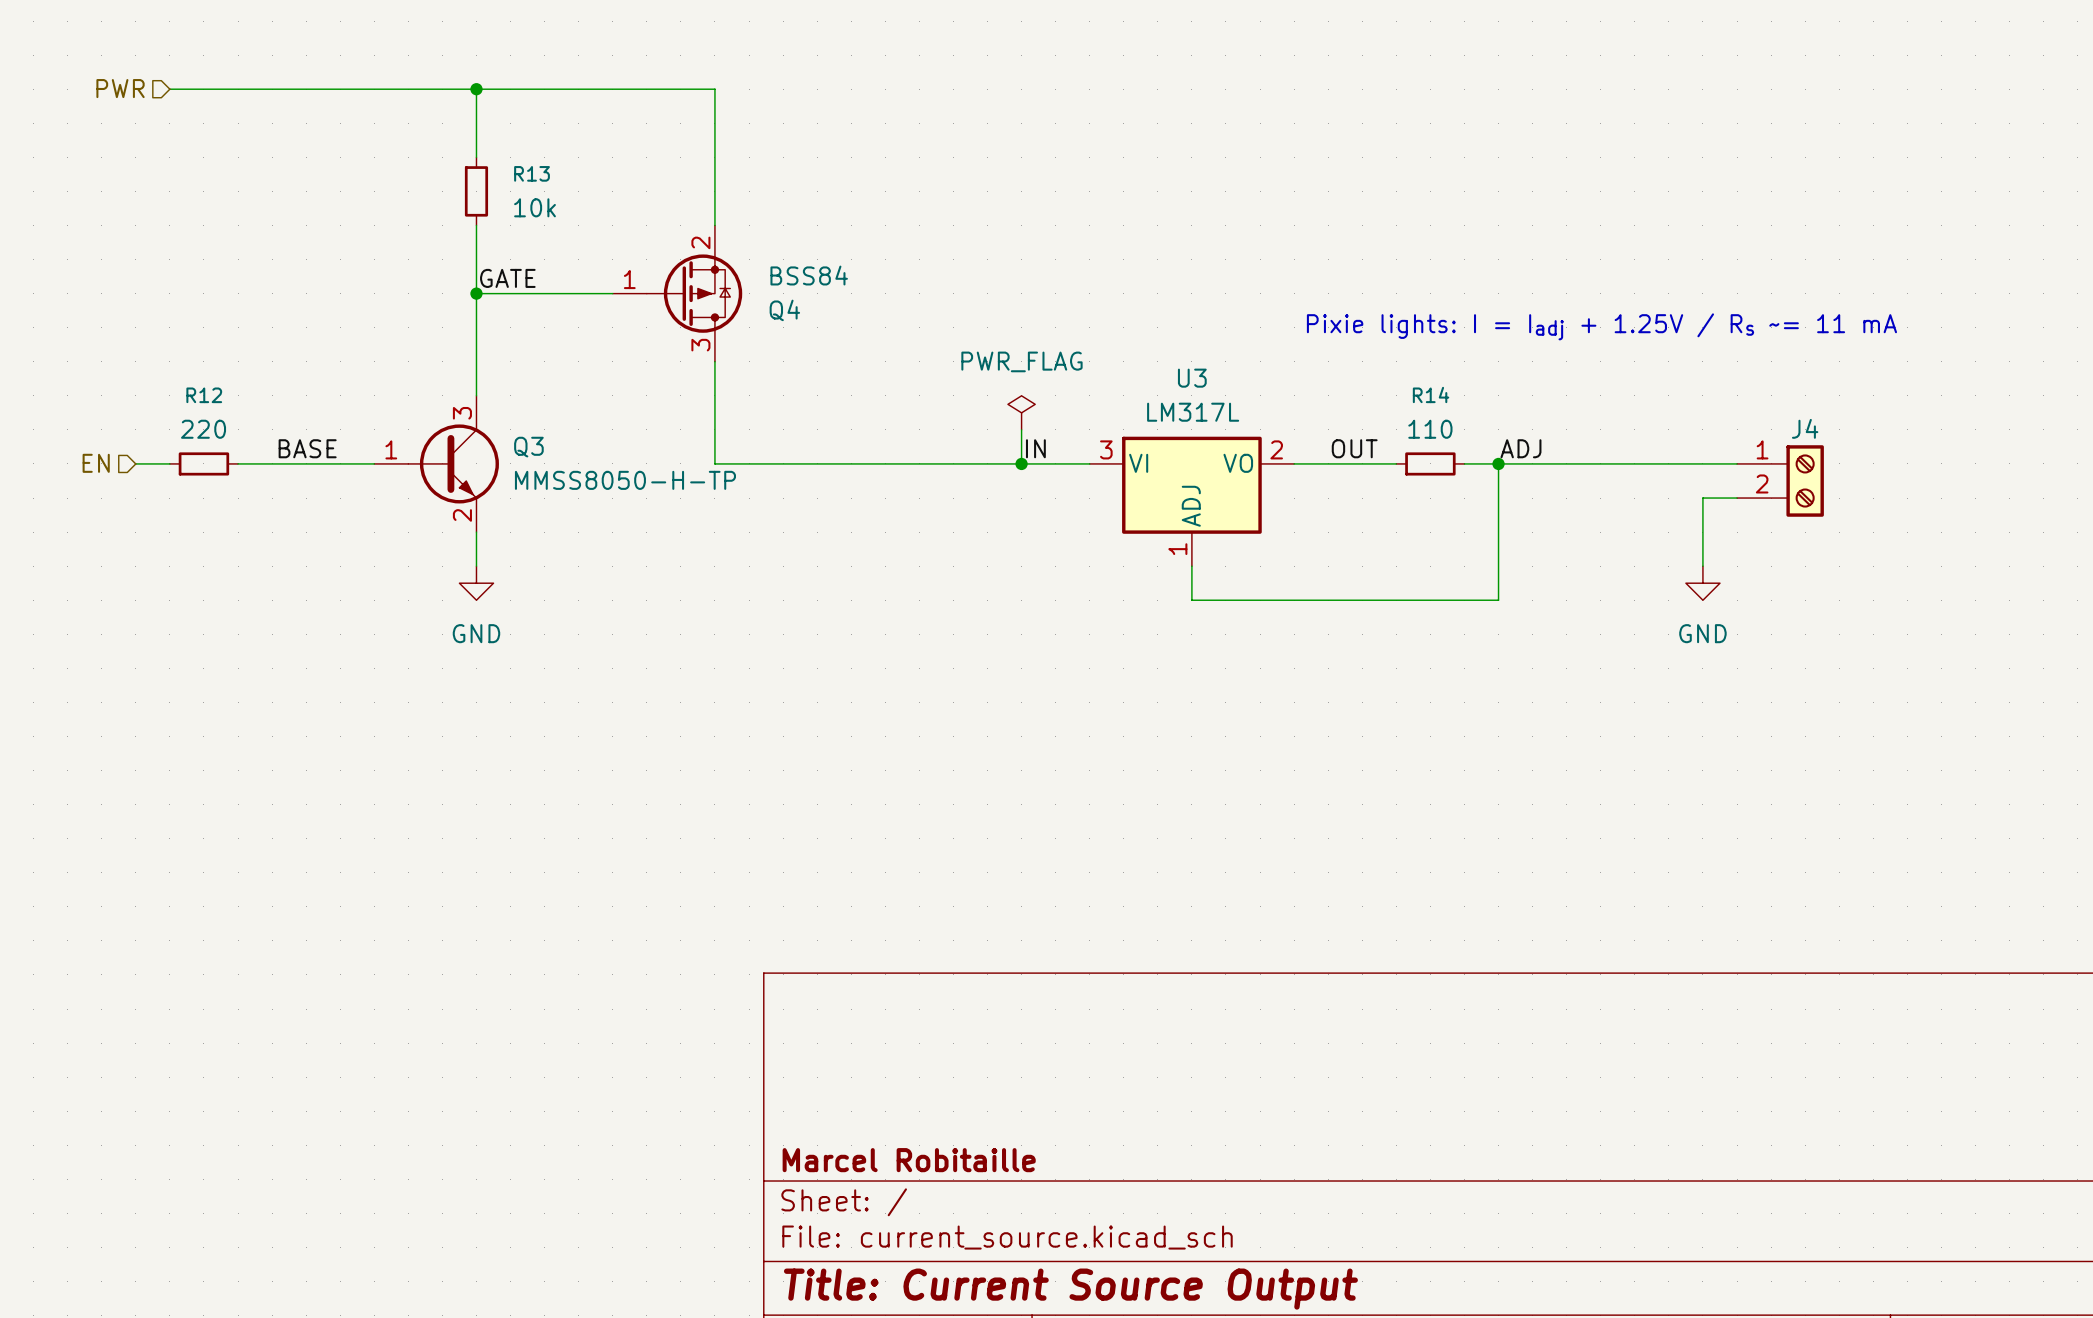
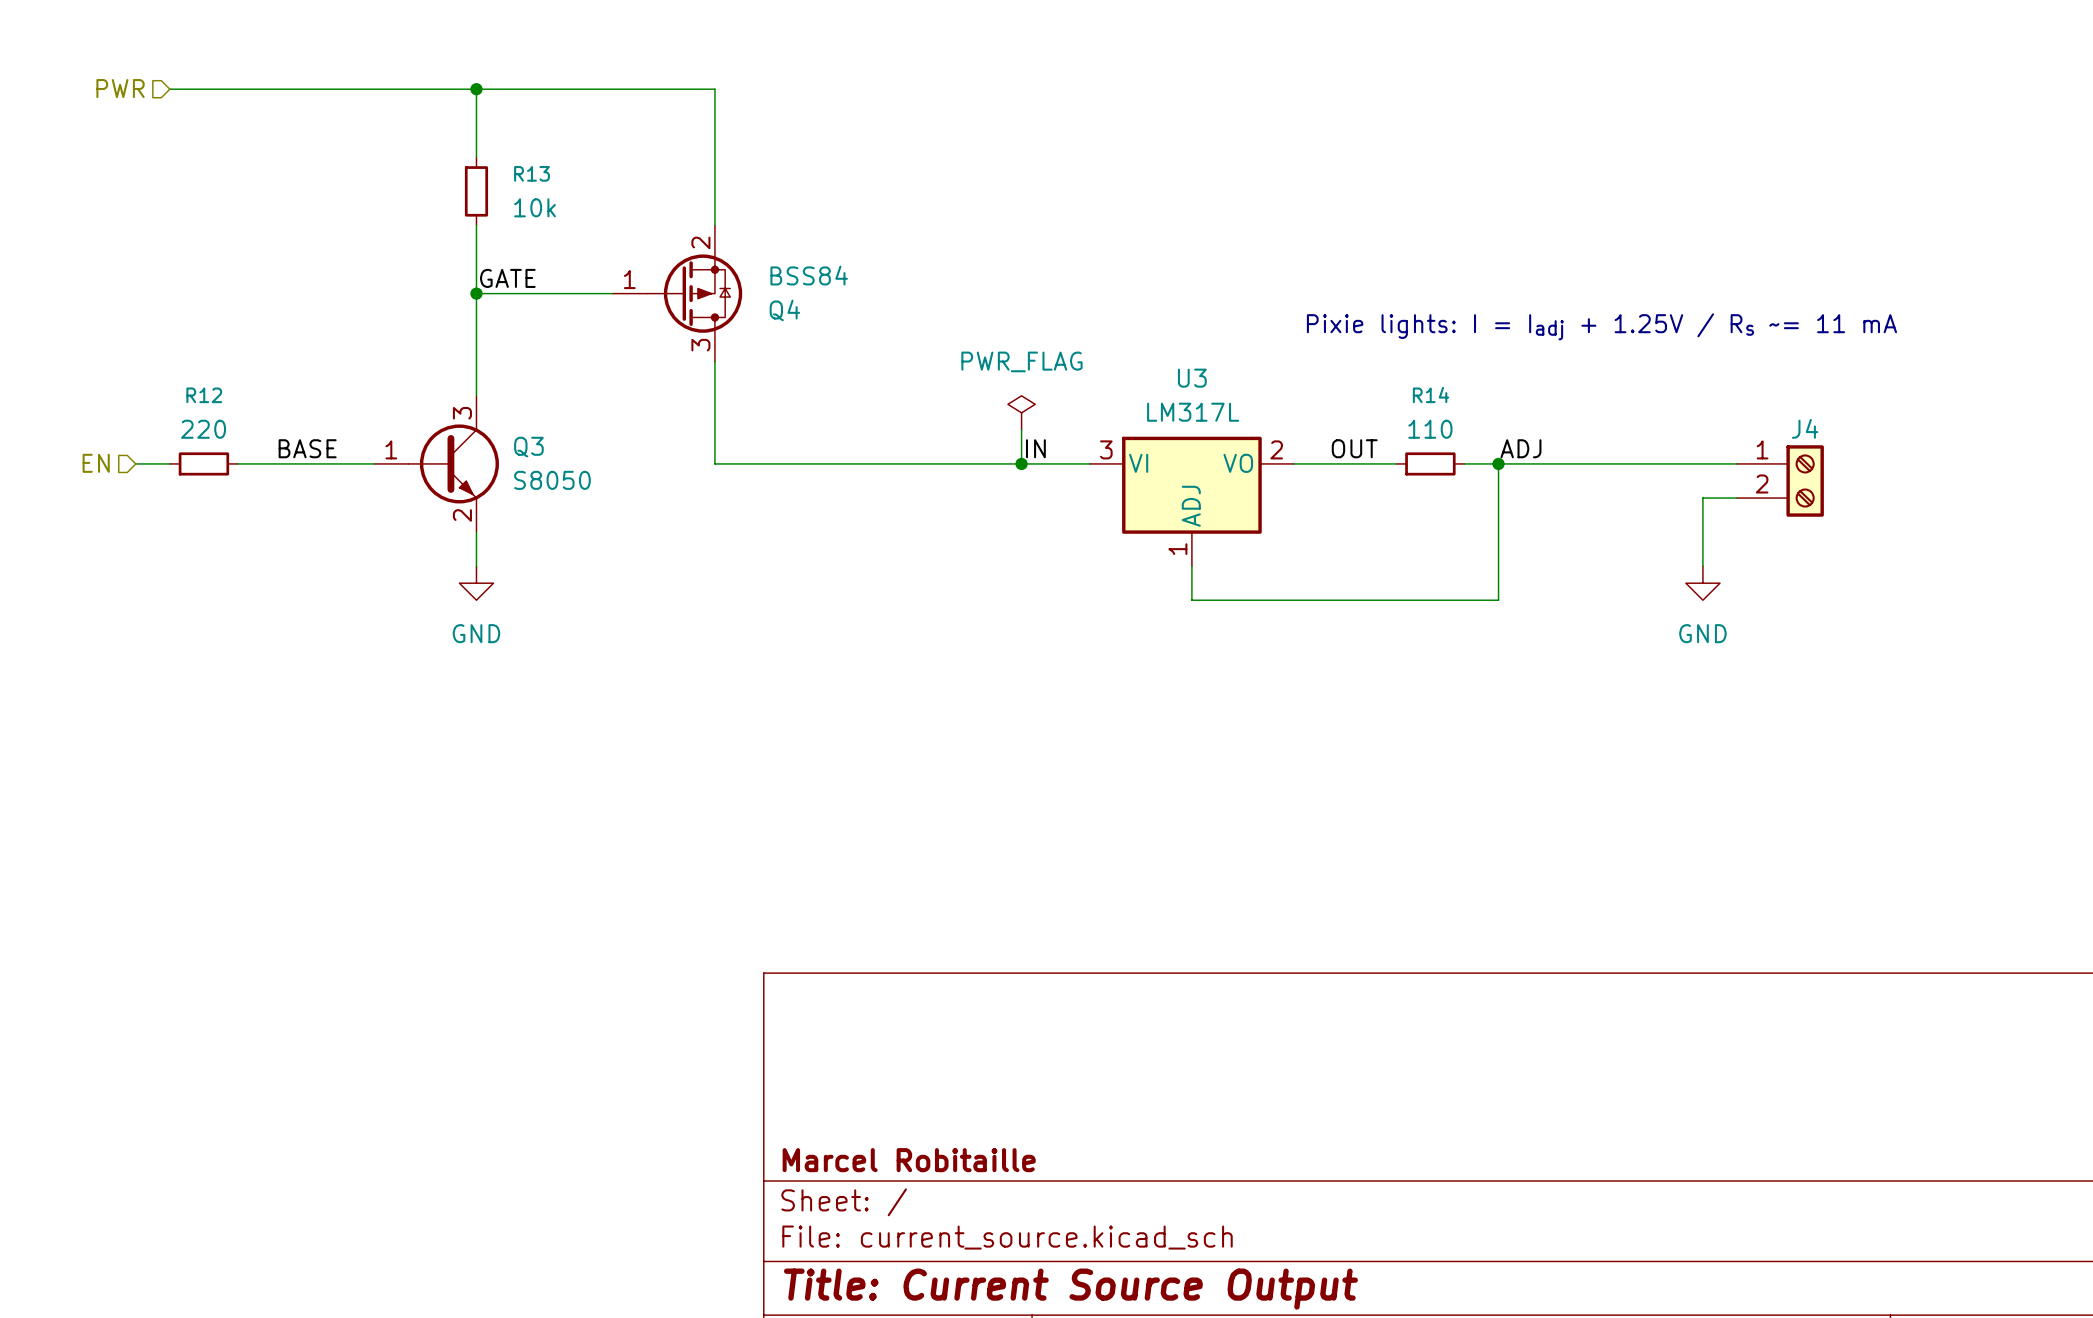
Q3 value: MMSS8050-H-TP (625, 480) -> S8050 (552, 480)

